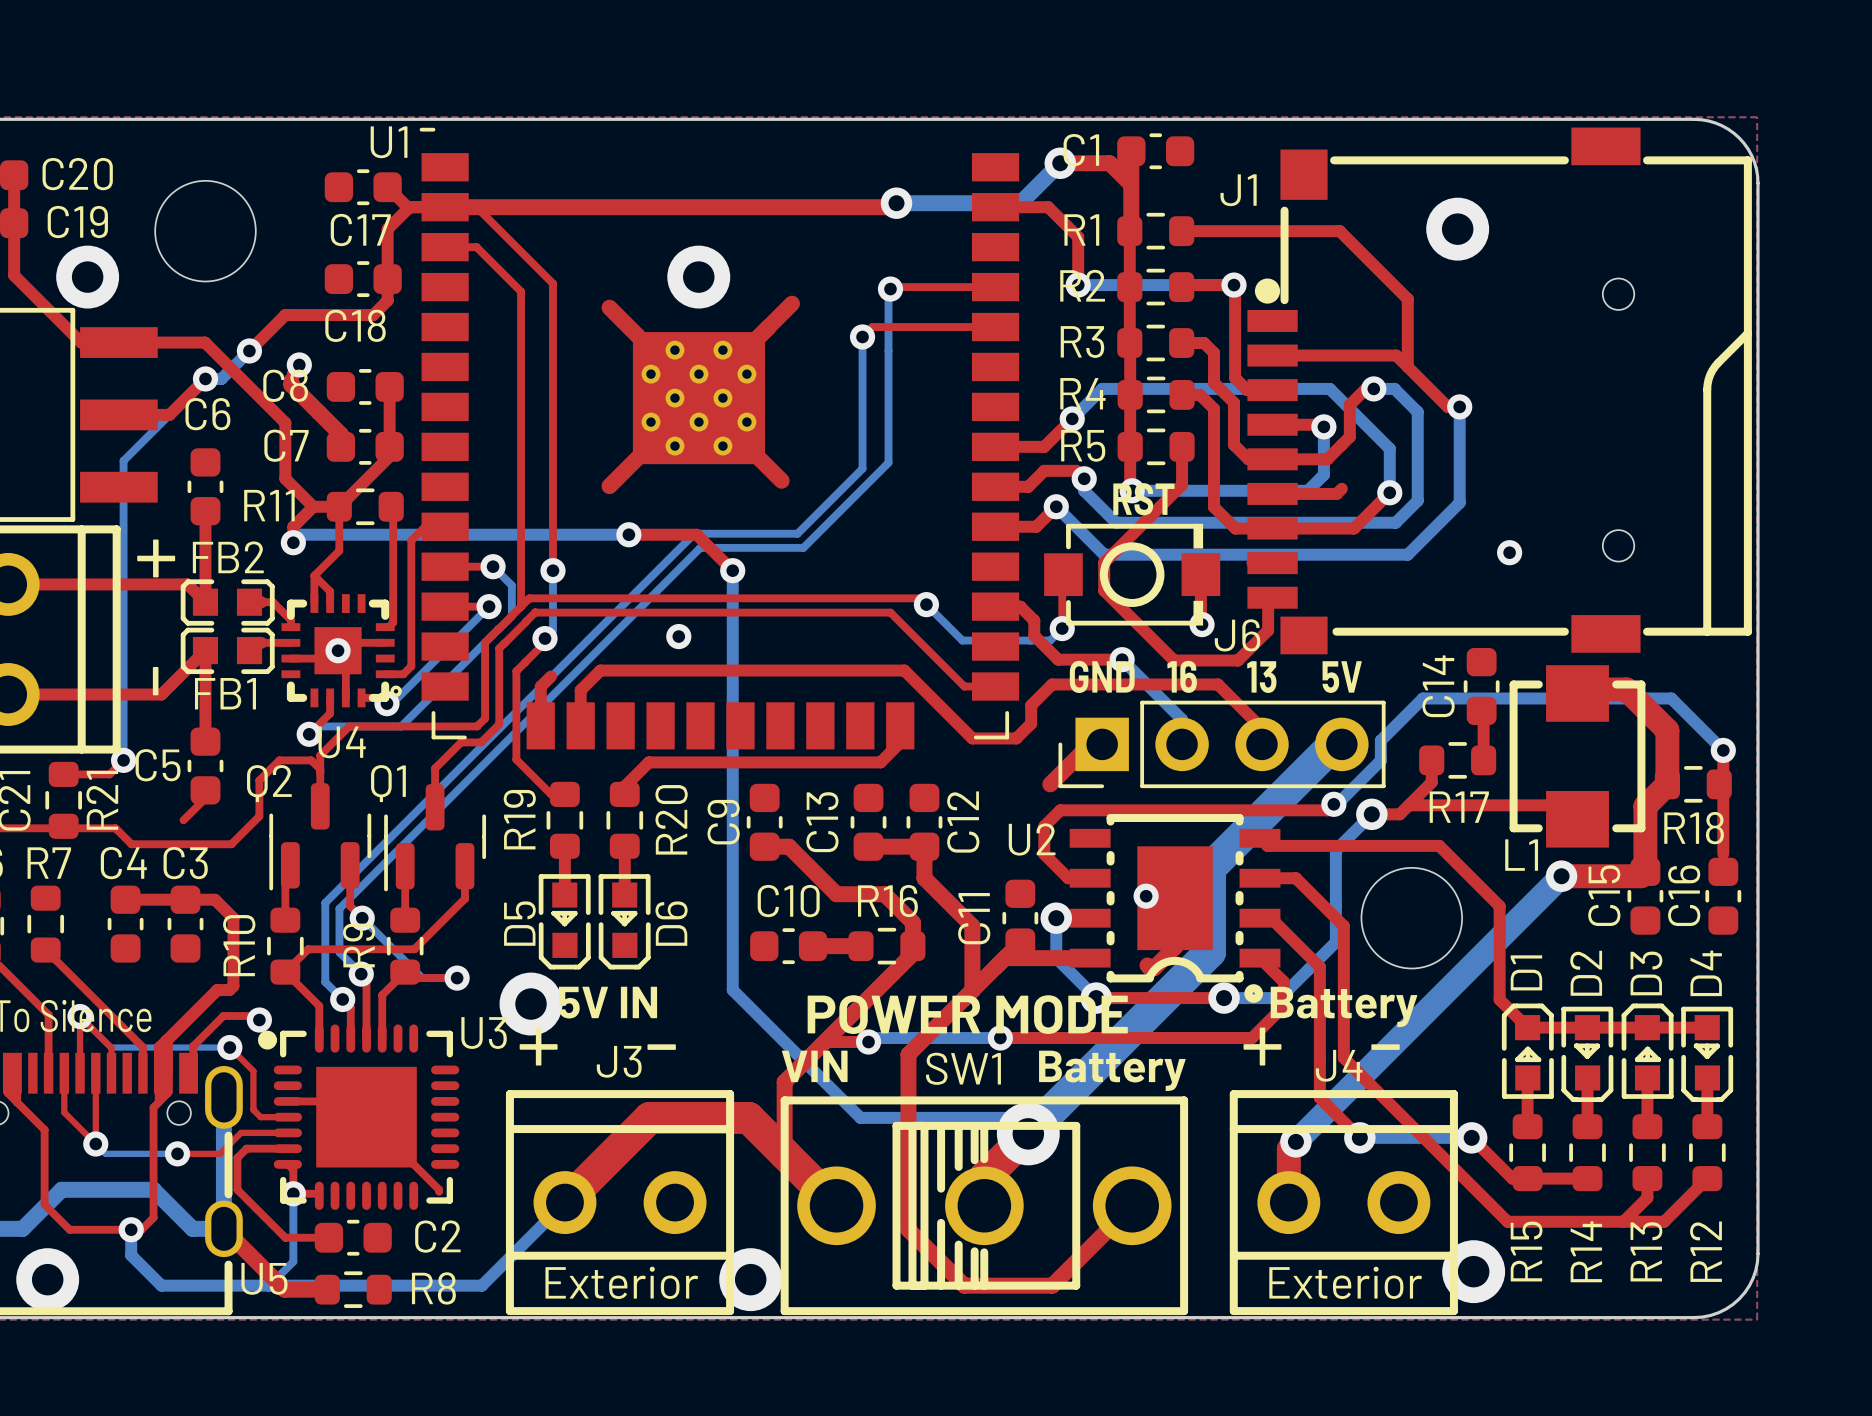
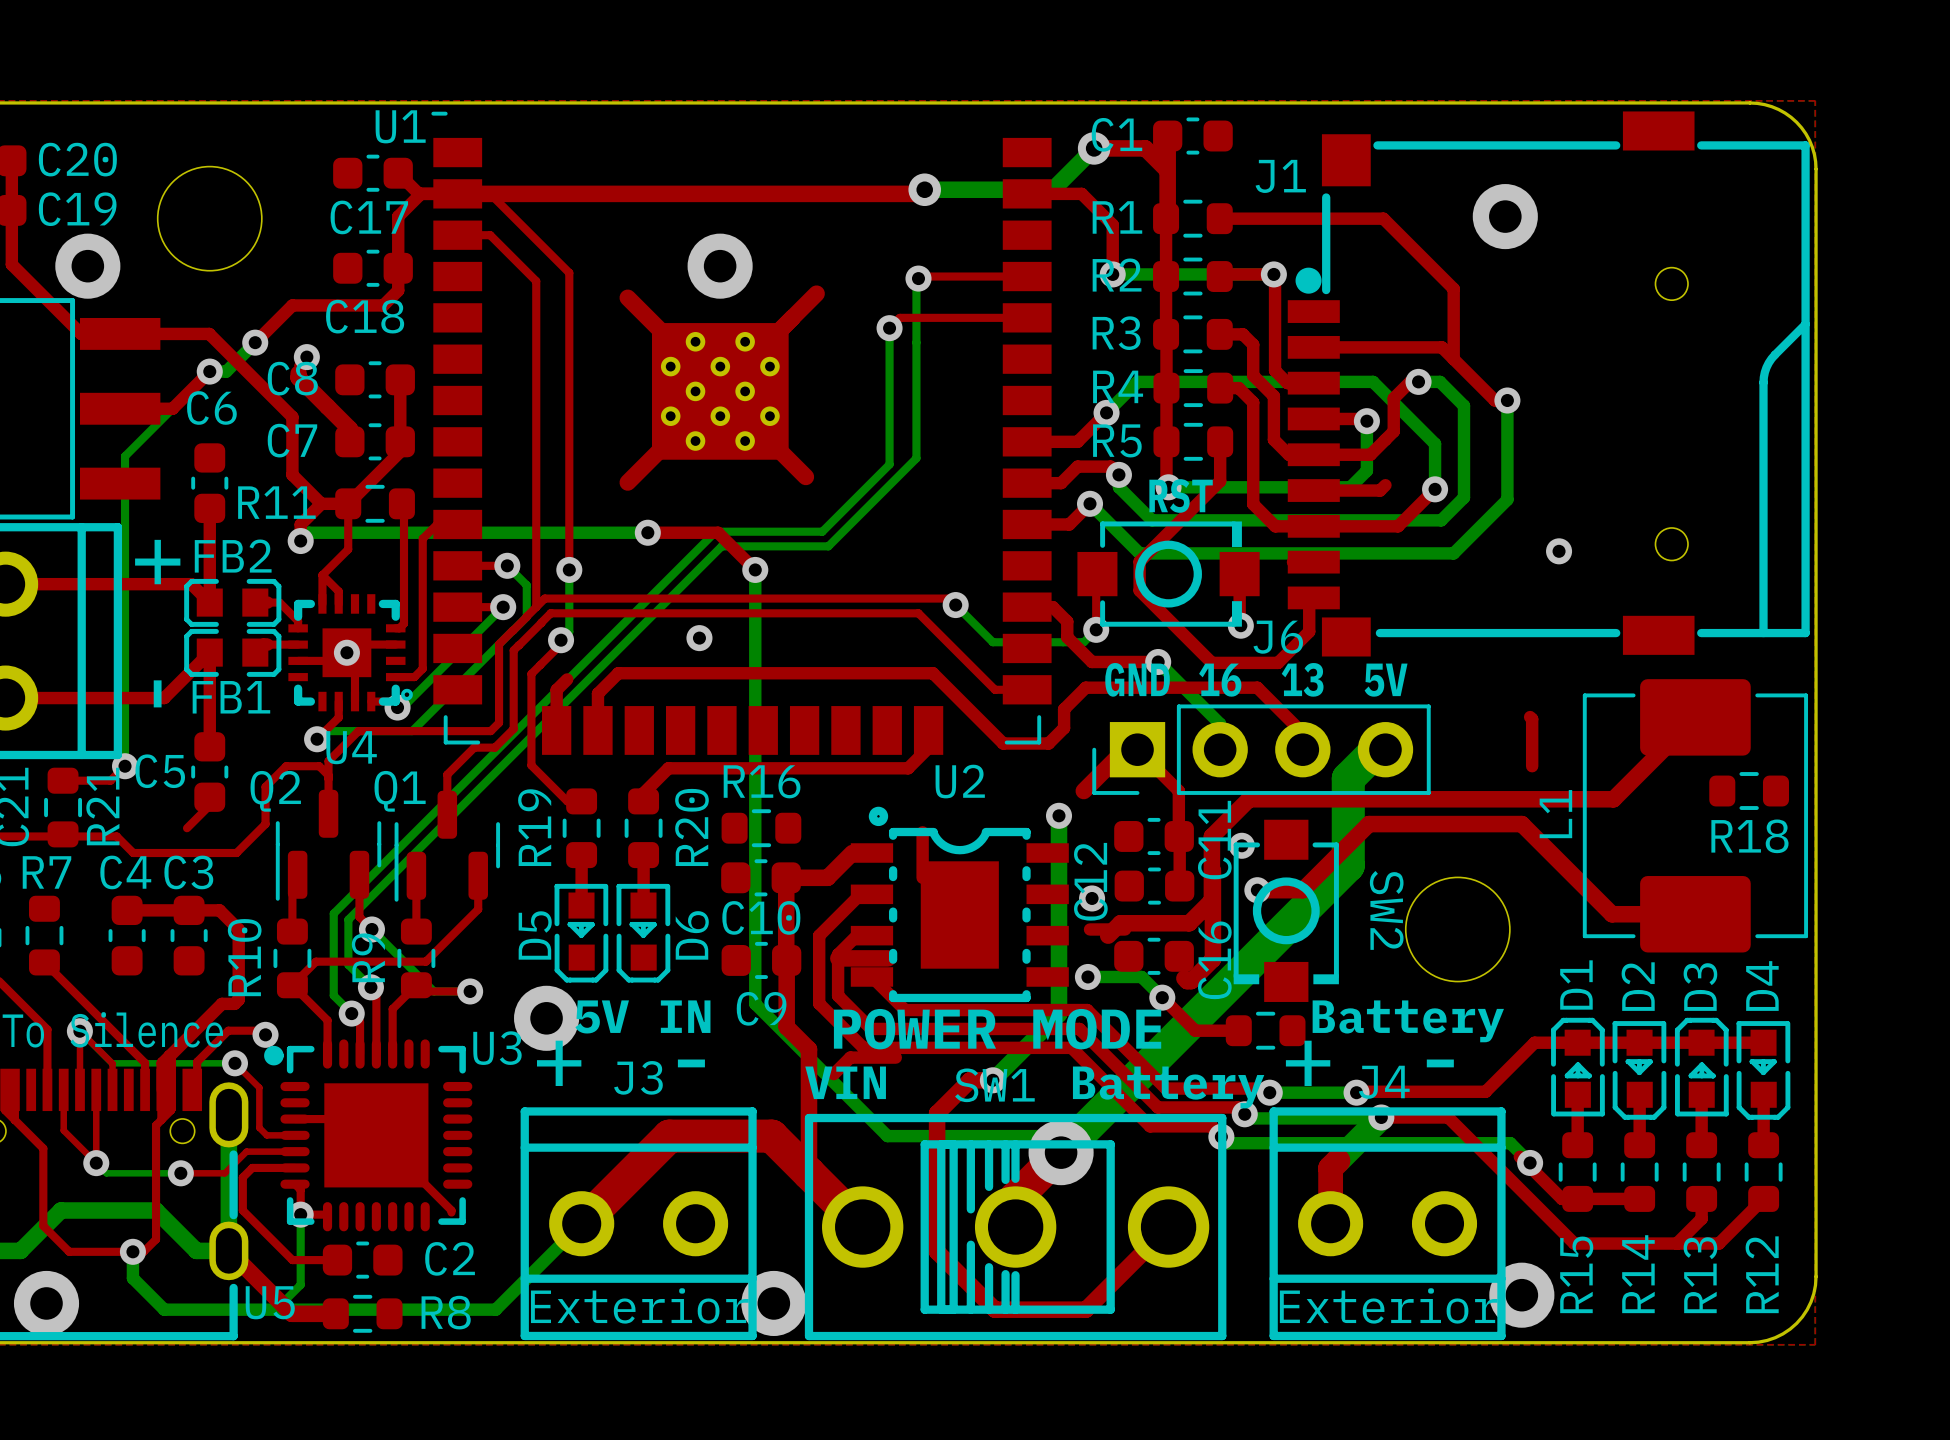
L1 footprint: [1509, 665, 1646, 848] -> [1582, 679, 1809, 953]
C14: (1481, 686) -> none
top track: (1577, 689) (1626, 689) (1667, 730) (1667, 784) (1645, 806) (1645, 871) (1640, 876) (1561, 876) (1561, 872) -> none
top track: none -> (1695, 717) (1613, 799) (1249, 799) (1211, 836) (1211, 900) (1189, 923) (1120, 923) (1108, 935)
top track: none -> (1137, 749) (1178, 791) (1179, 886)
top track: (1723, 750) (1723, 853) -> none
bottom track: (1723, 750) (1671, 698) (1422, 698) (1380, 740) (1380, 760) (1337, 804) (1333, 804) -> none
via: (1723, 750) -> none
top track: (1429, 758) (1431, 760) (1431, 782) (1399, 814) (1371, 814) -> none
R17: (1457, 760) -> none
bottom track: (1305, 772) (1210, 868) (1210, 952) -> (1348, 778) (1348, 865) (1249, 964)
top track: (1333, 804) (1327, 810) (1060, 810) (1044, 826) (1044, 854) (1068, 878) (1090, 878) -> none
via: (1333, 804) -> none
top track: (1408, 805) (1561, 804) (1572, 815) (1577, 815) -> none
bottom track: none -> (1059, 815) (1059, 1014) (992, 1080)
via: none -> (1059, 815)
bottom track: (1371, 814) (1335, 850) (1335, 942) (1279, 998) (1224, 998) -> none
via: (1371, 814) -> none
C9 rotation: 0° (764, 822) -> 90° clockwise (761, 960)
C9 position: (764, 822) -> (761, 960)
C13: (868, 822) -> none
C12 rotation: 0° (924, 822) -> 90° clockwise (1154, 886)
C12 position: (924, 822) -> (1154, 886)
C12 name position: C12 (963, 822) -> C12 (1090, 881)
top track: none -> (922, 832) (922, 877)
via: none -> (1241, 845)
top track: (1259, 838) (1267, 845) (1439, 845) (1499, 906) (1499, 999) (1527, 1027) -> (1356, 1092) (1485, 1091) (1534, 1042) (1577, 1042)
U2 name position: U2 (1032, 839) -> U2 (960, 781)
top track: none -> (871, 853) (852, 853) (827, 877) (786, 877) (786, 951)
top track: (764, 846) (789, 846) (836, 894) (884, 894) (912, 922) (912, 953) (784, 1081) -> (786, 952) (786, 1027) (808, 1049) (808, 1098)
top track: (868, 846) (924, 846) (924, 878) (972, 926) (972, 990) -> none
L1 name position: L1 (1521, 855) -> L1 (1555, 814)
bottom track: (1561, 876) (1337, 1099) -> none
via: (1561, 876) -> none
top track: (1259, 878) (1295, 878) (1343, 926) (1343, 1057) (1507, 1221) (1524, 1221) -> (1381, 1117) (1448, 1117) (1574, 1243)
top track: none -> (1257, 890) (1302, 890) (1368, 824) (1521, 824) (1612, 914) (1695, 914)
via: none -> (1257, 890)
top track: none -> (871, 894) (860, 894) (819, 935) (819, 1003) (863, 1047) (1071, 1047) (1150, 1126) (1211, 1126) (1221, 1136)
via: none -> (1092, 898)
C16 name position: C16 (1684, 895) -> C16 (1214, 960)
via: (1146, 896) -> none
C15: (1645, 896) -> none
C16 rotation: 0° (1723, 896) -> 90° clockwise (1154, 956)
C16 position: (1723, 896) -> (1154, 956)
SW2: none -> (1286, 910)
C10 name position: C10 (788, 901) -> C10 (761, 917)
U2 rotation: 0° (1175, 908) -> 180° (959, 904)
U2 position: (1175, 908) -> (959, 904)
C11 name position: C11 (974, 918) -> C11 (1214, 840)
C11 rotation: 0° (1020, 918) -> 90° clockwise (1154, 836)
C11 position: (1020, 918) -> (1154, 836)
bottom track: (1056, 918) (1056, 958) (1096, 998) -> none
via: (1056, 918) -> none
top track: (1259, 918) (1270, 918) (1319, 967) (1319, 1097) (1359, 1137) -> none
top track: none -> (871, 935) (856, 935) (838, 954) (838, 995) (871, 1028) (1079, 1028) (1157, 1107) (1237, 1107) (1244, 1114)
top track: (1020, 942) (908, 1054) (908, 1095) -> (992, 1080) (970, 1080) (937, 1113)
C10 position: (788, 946) -> (761, 877)
R16 position: (886, 946) -> (761, 828)
top track: (1004, 958) (1090, 958) -> none
top track: (1259, 958) (1283, 982) (1283, 1006) (1252, 1038) (1000, 1038) -> none
top track: none -> (871, 976) (905, 1010) (1087, 1010) (1165, 1088) (1265, 1088) (1269, 1092)
bottom track: none -> (1087, 976) (1141, 976) (1162, 997)
via: none -> (1087, 976)
top track: none -> (1162, 997) (1195, 1030) (1238, 1030)
via: none -> (1162, 997)
top track: (1096, 998) (1224, 998) -> none
via: (1096, 998) -> none
via: (1224, 998) -> none
part: none -> (1265, 1030)
bottom track: (1000, 1038) (872, 1038) (868, 1042) -> none
via: (1000, 1038) -> none
via: (868, 1042) -> none
via: none -> (992, 1080)
bottom track: none -> (1269, 1092) (1356, 1092)
via: none -> (1269, 1092)
via: none -> (1356, 1092)
bottom track: none -> (1244, 1114) (1248, 1118) (1380, 1118)
via: none -> (1244, 1114)
via: none -> (1381, 1117)
bottom track: none -> (1221, 1136) (1227, 1143) (1510, 1143) (1530, 1162)
via: none -> (1221, 1136)
via size: [1455, 1122, 1488, 1154] -> [1517, 1149, 1544, 1176]
bottom track: (1359, 1137) (1471, 1137) -> none
via: (1359, 1137) -> none
via: (1295, 1141) -> none

